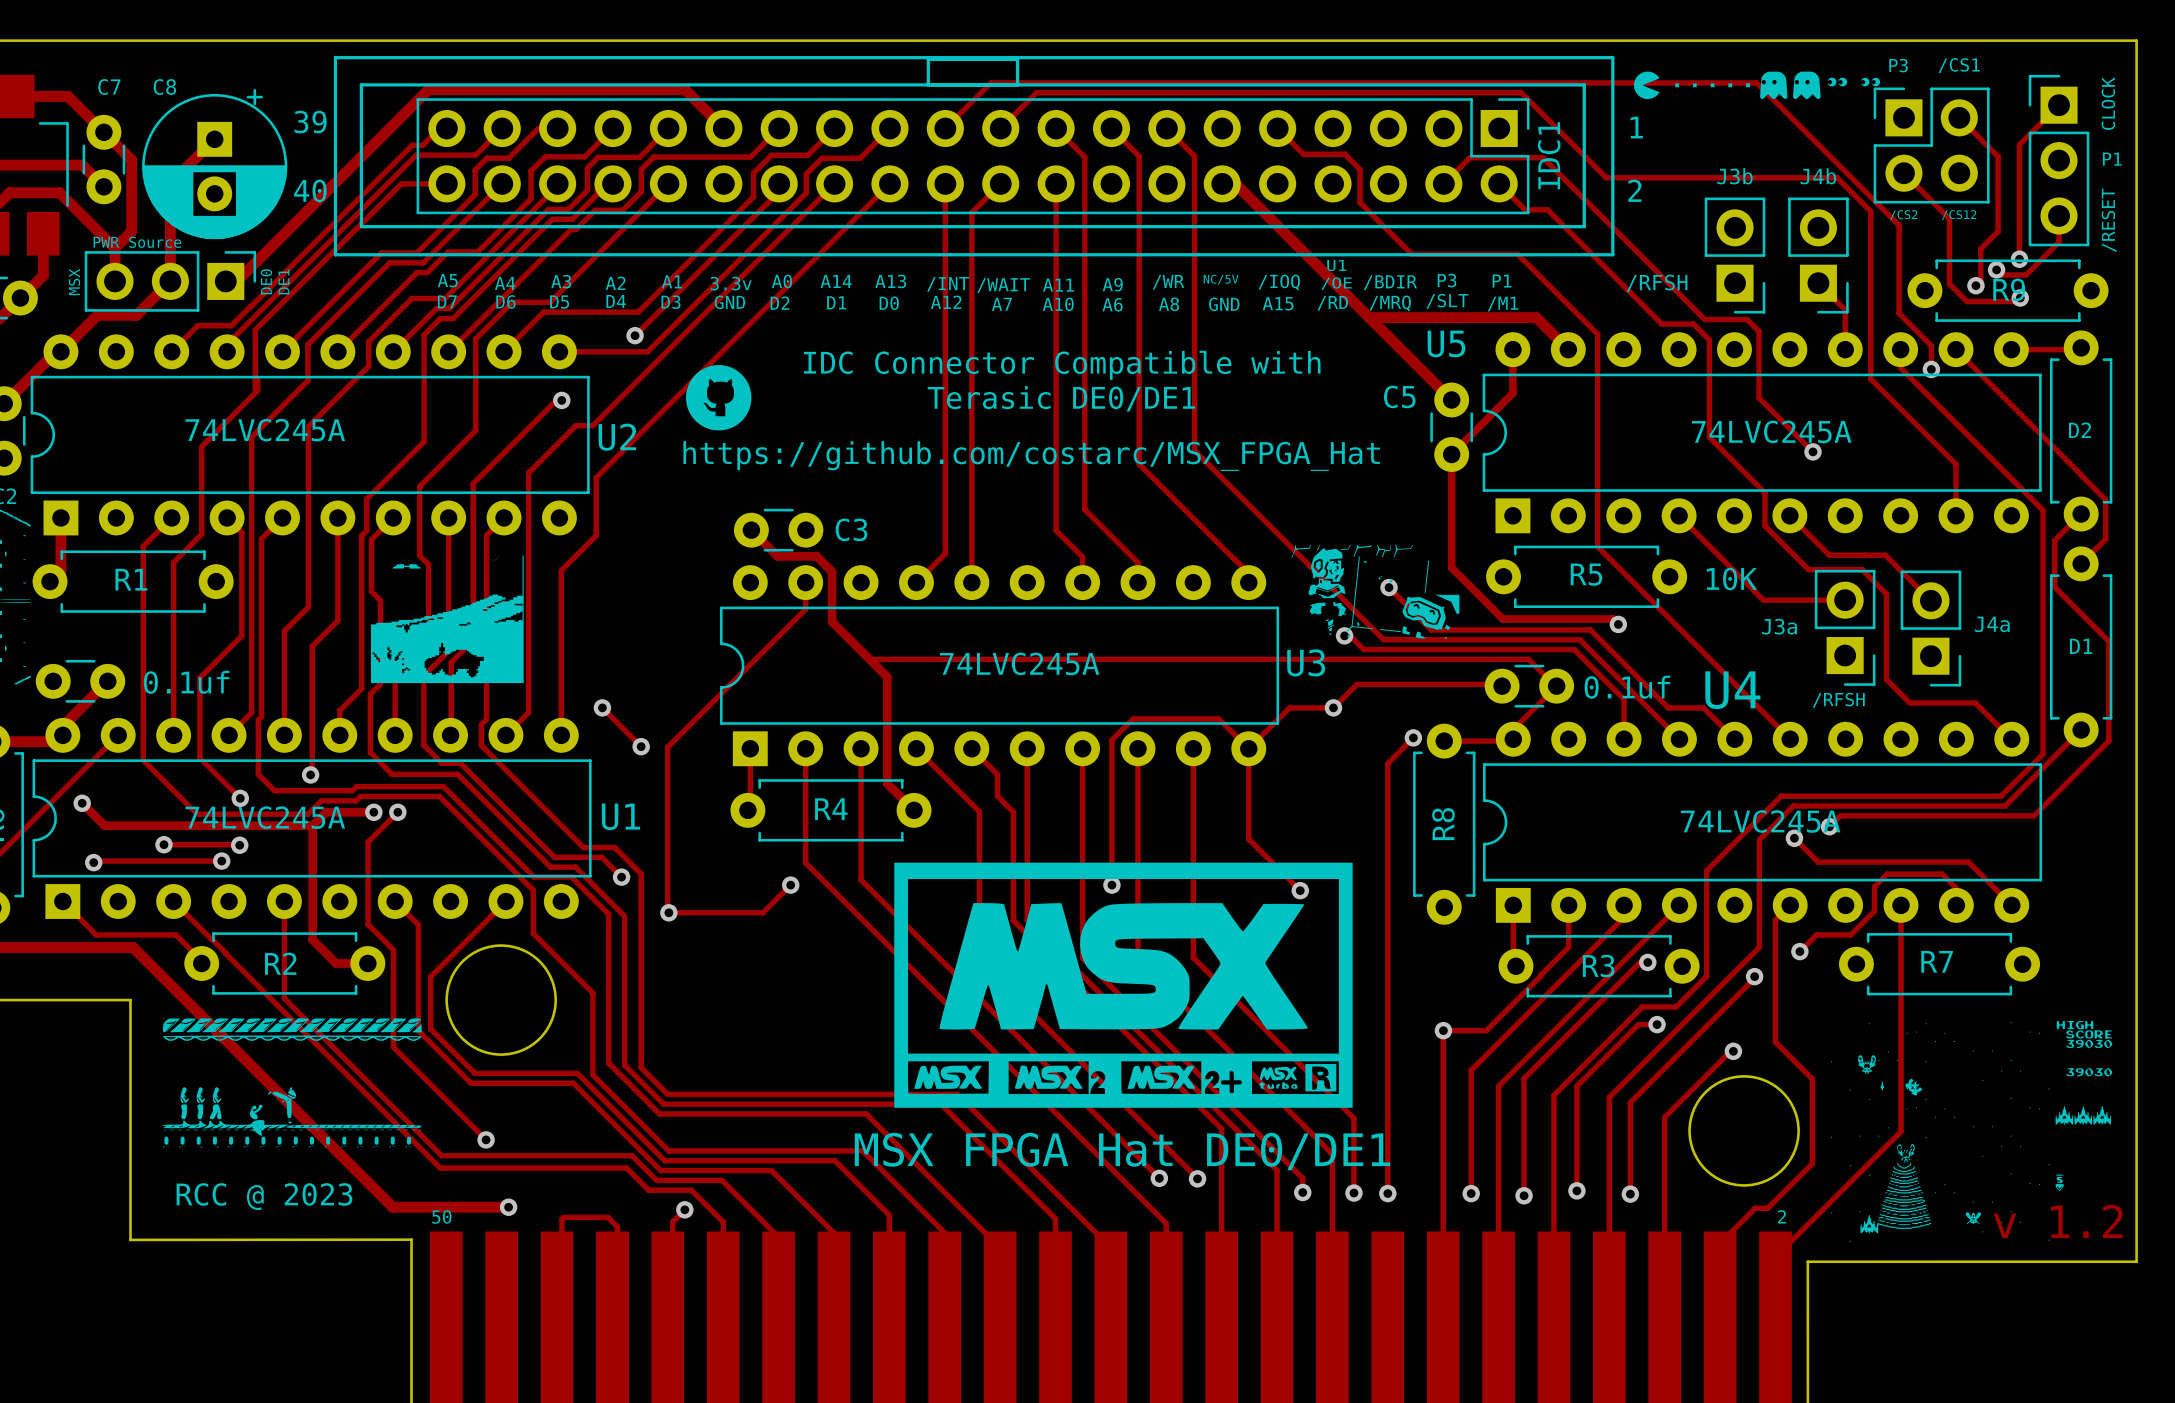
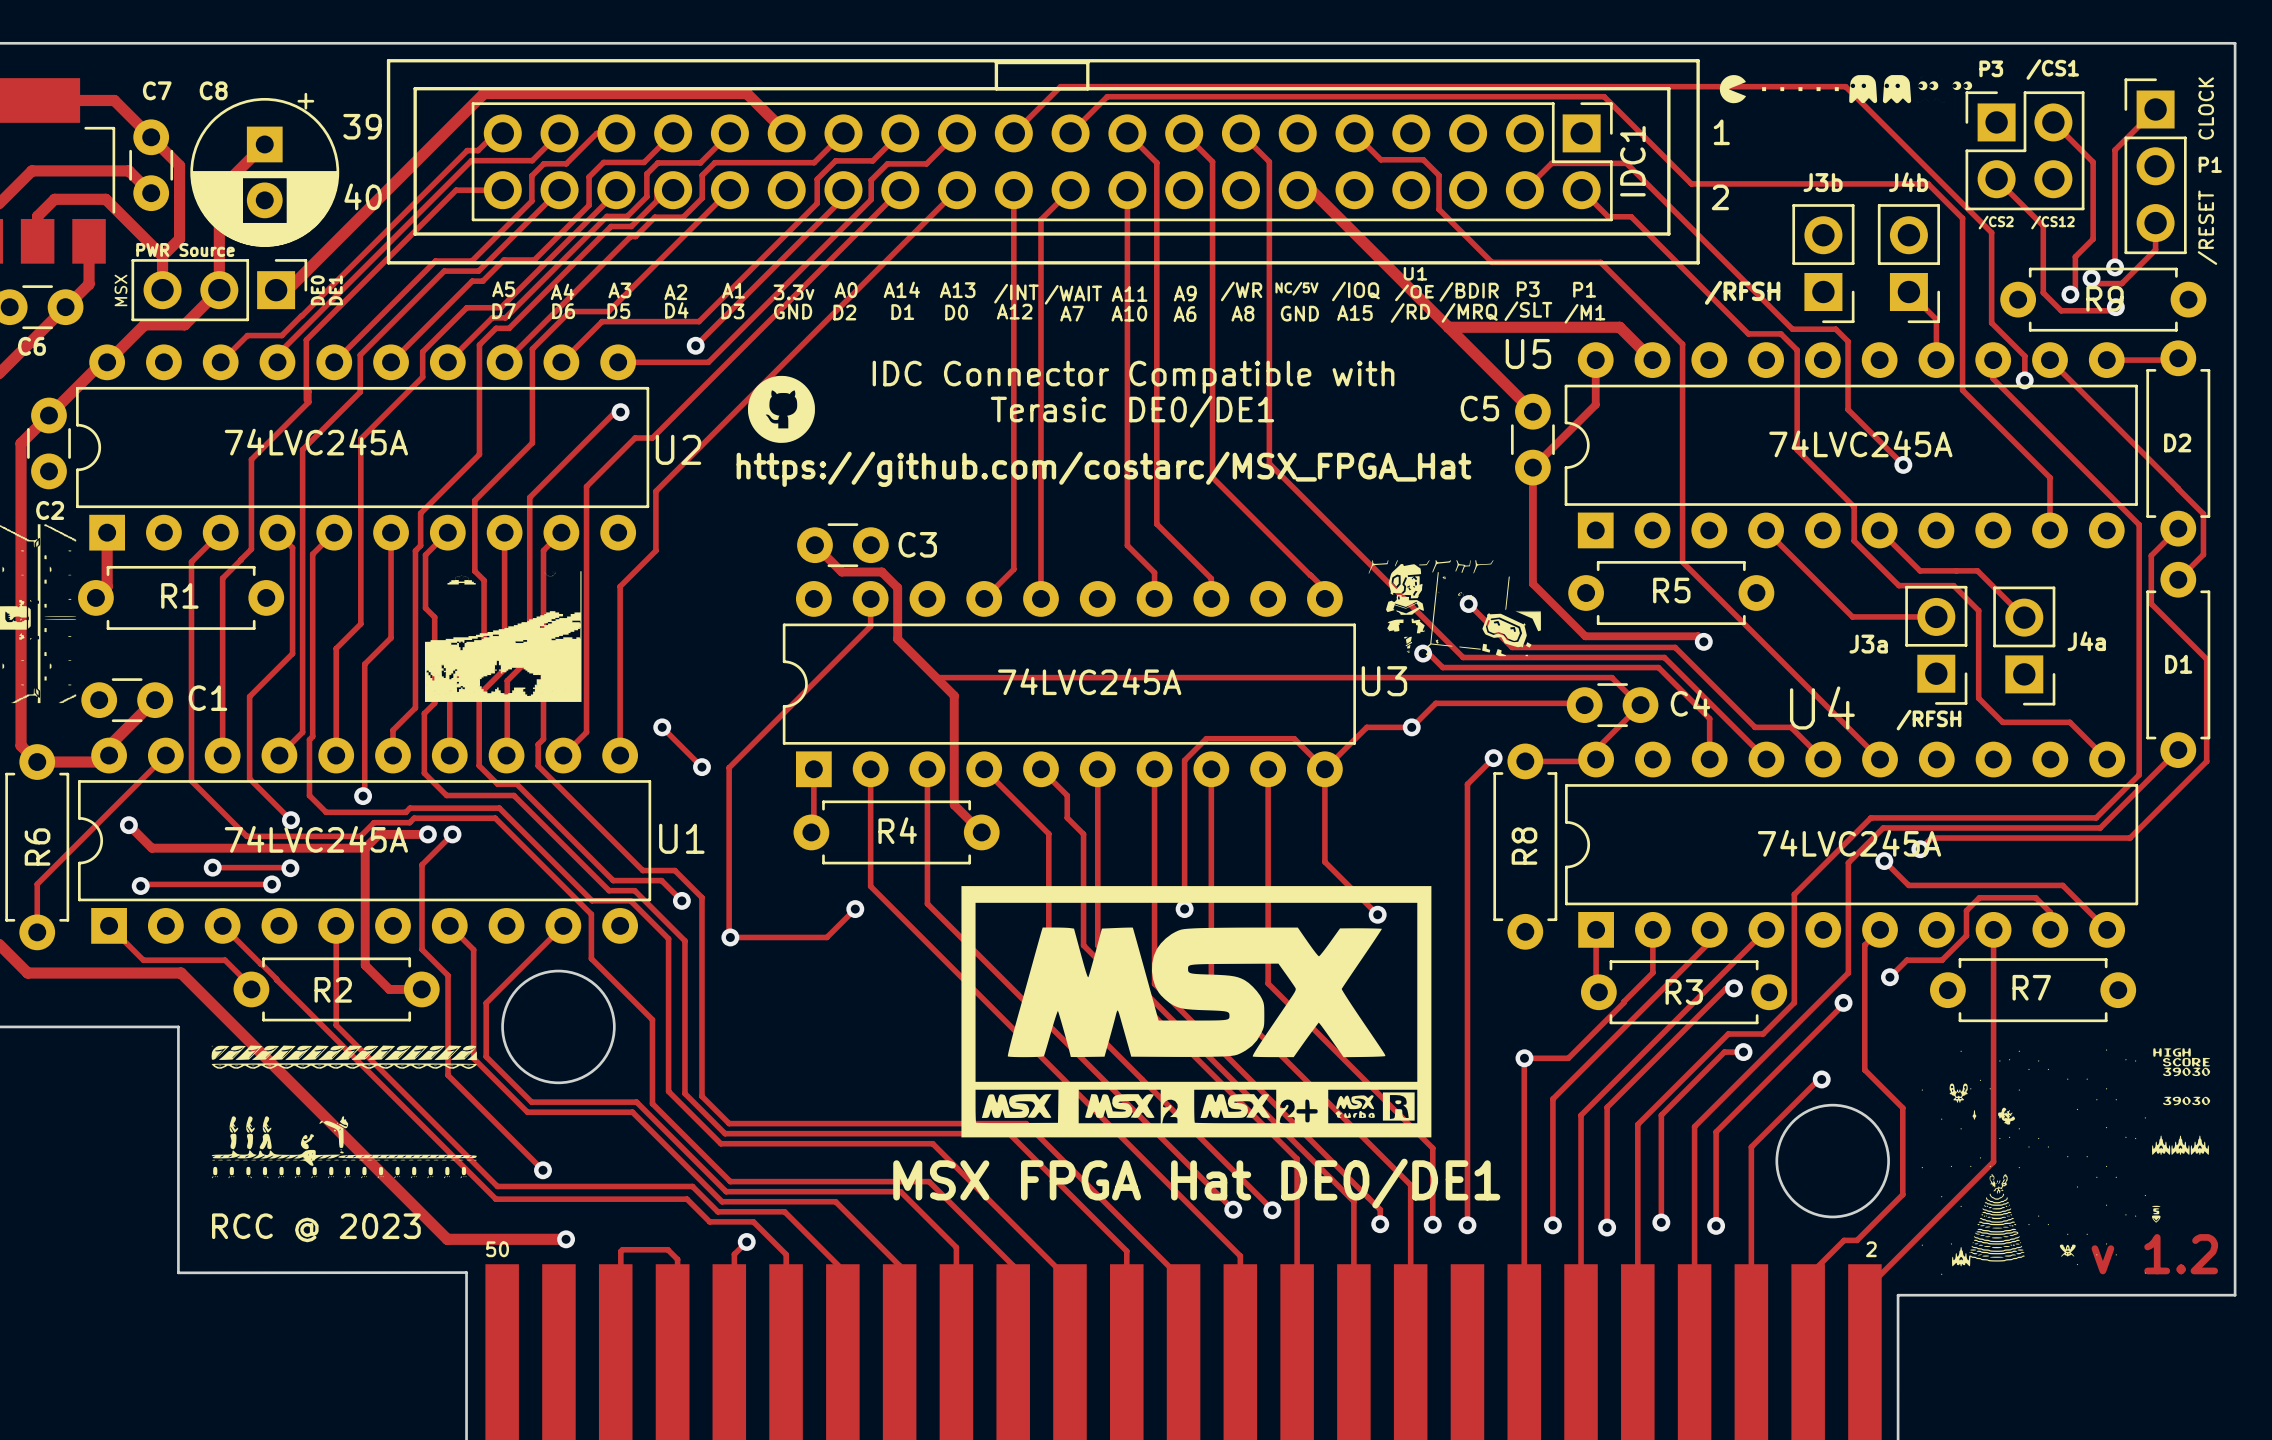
R5 value: 10K (1731, 578) -> none
C1 name: none -> C1 (207, 698)
C1 value: 0.1uf (186, 682) -> none
C4 name: none -> C4 (1690, 703)
C4 value: 0.1uf (1627, 687) -> none

